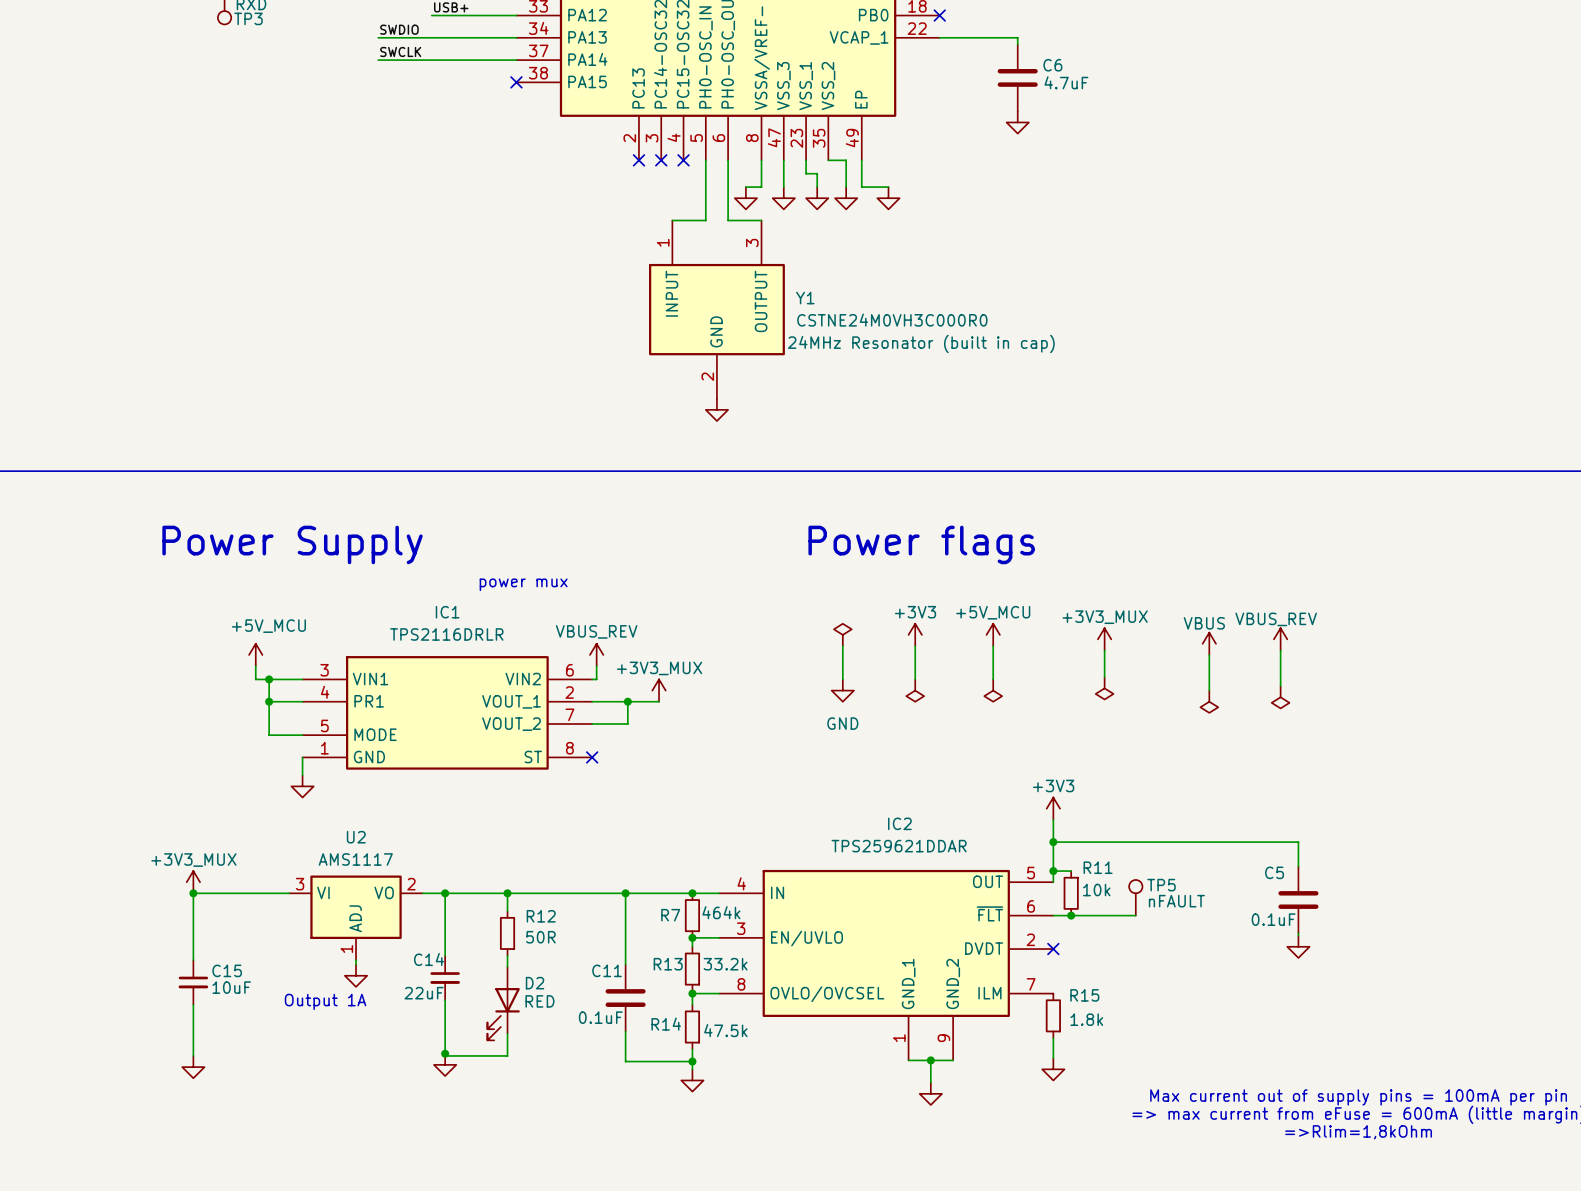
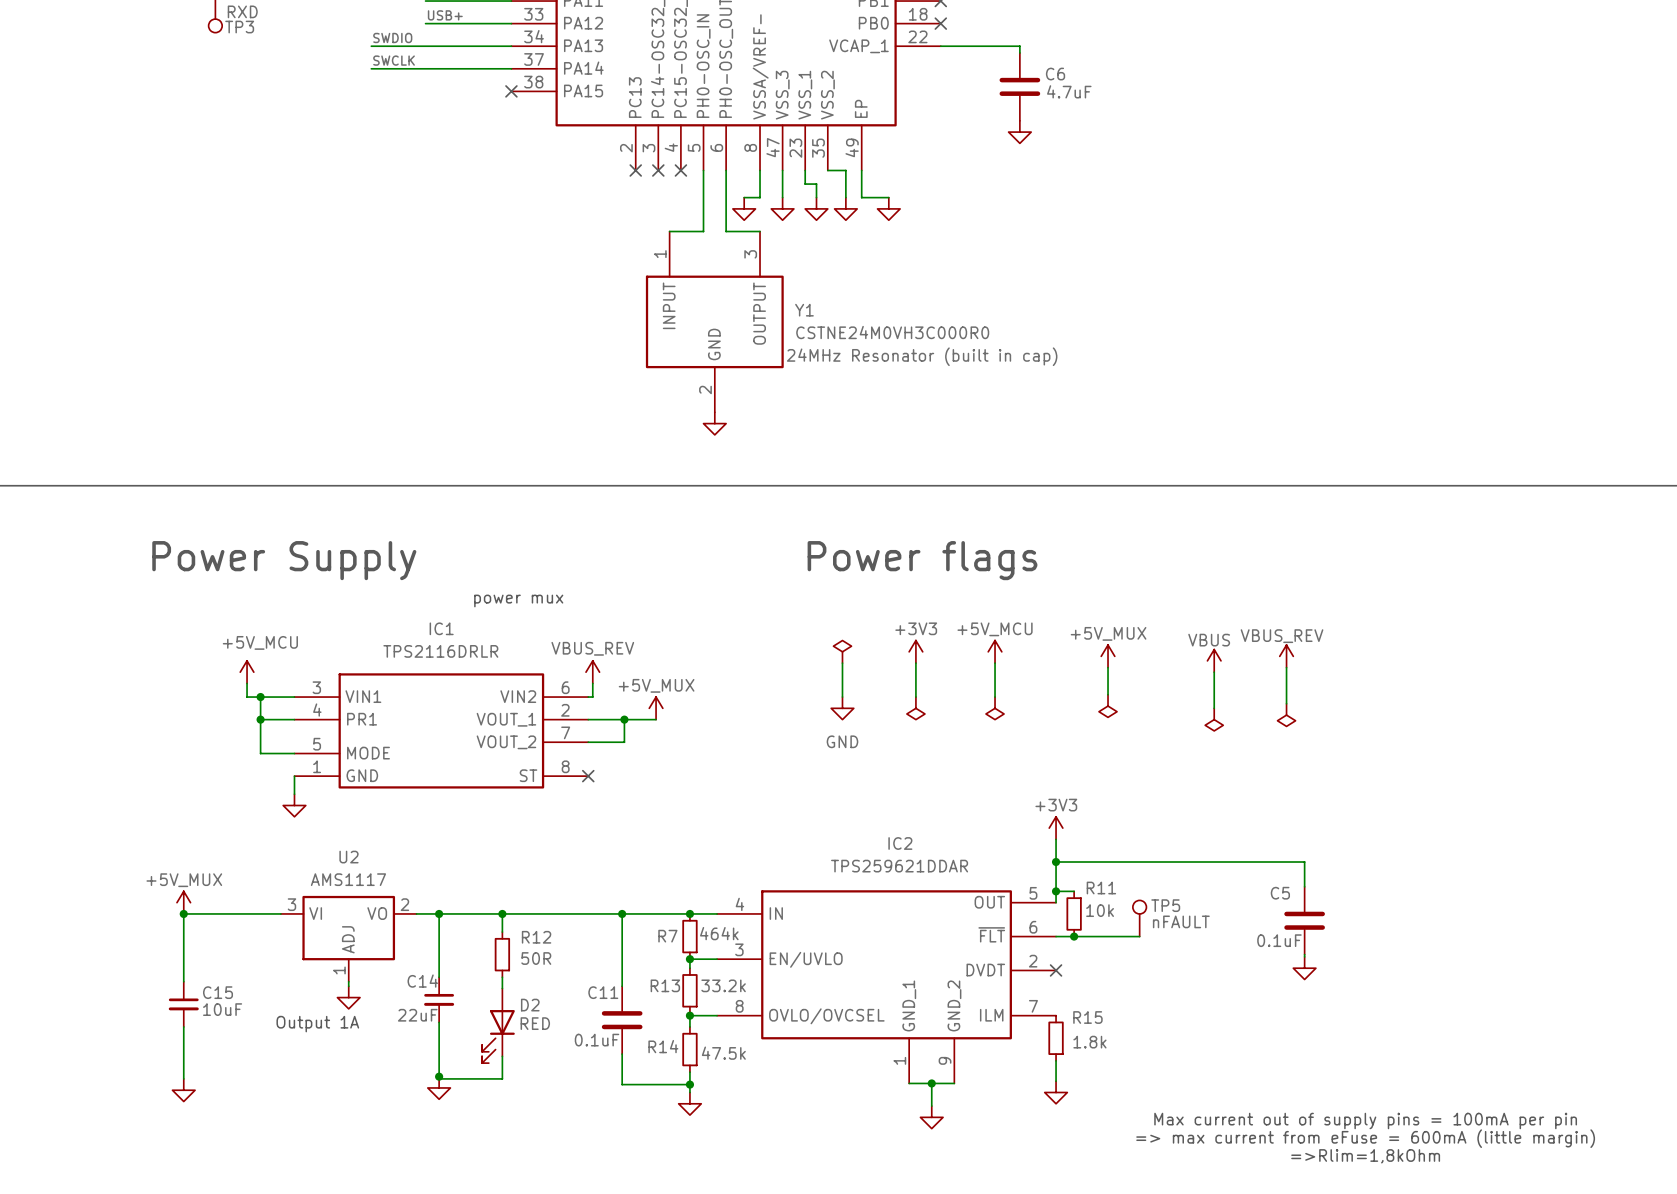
power symbol: +3V3_MUX (1104, 639) -> +5V_MUX (1108, 656)
power symbol: +3V3_MUX (659, 690) -> +5V_MUX (656, 708)
power symbol: +3V3_MUX (193, 882) -> +5V_MUX (183, 902)

